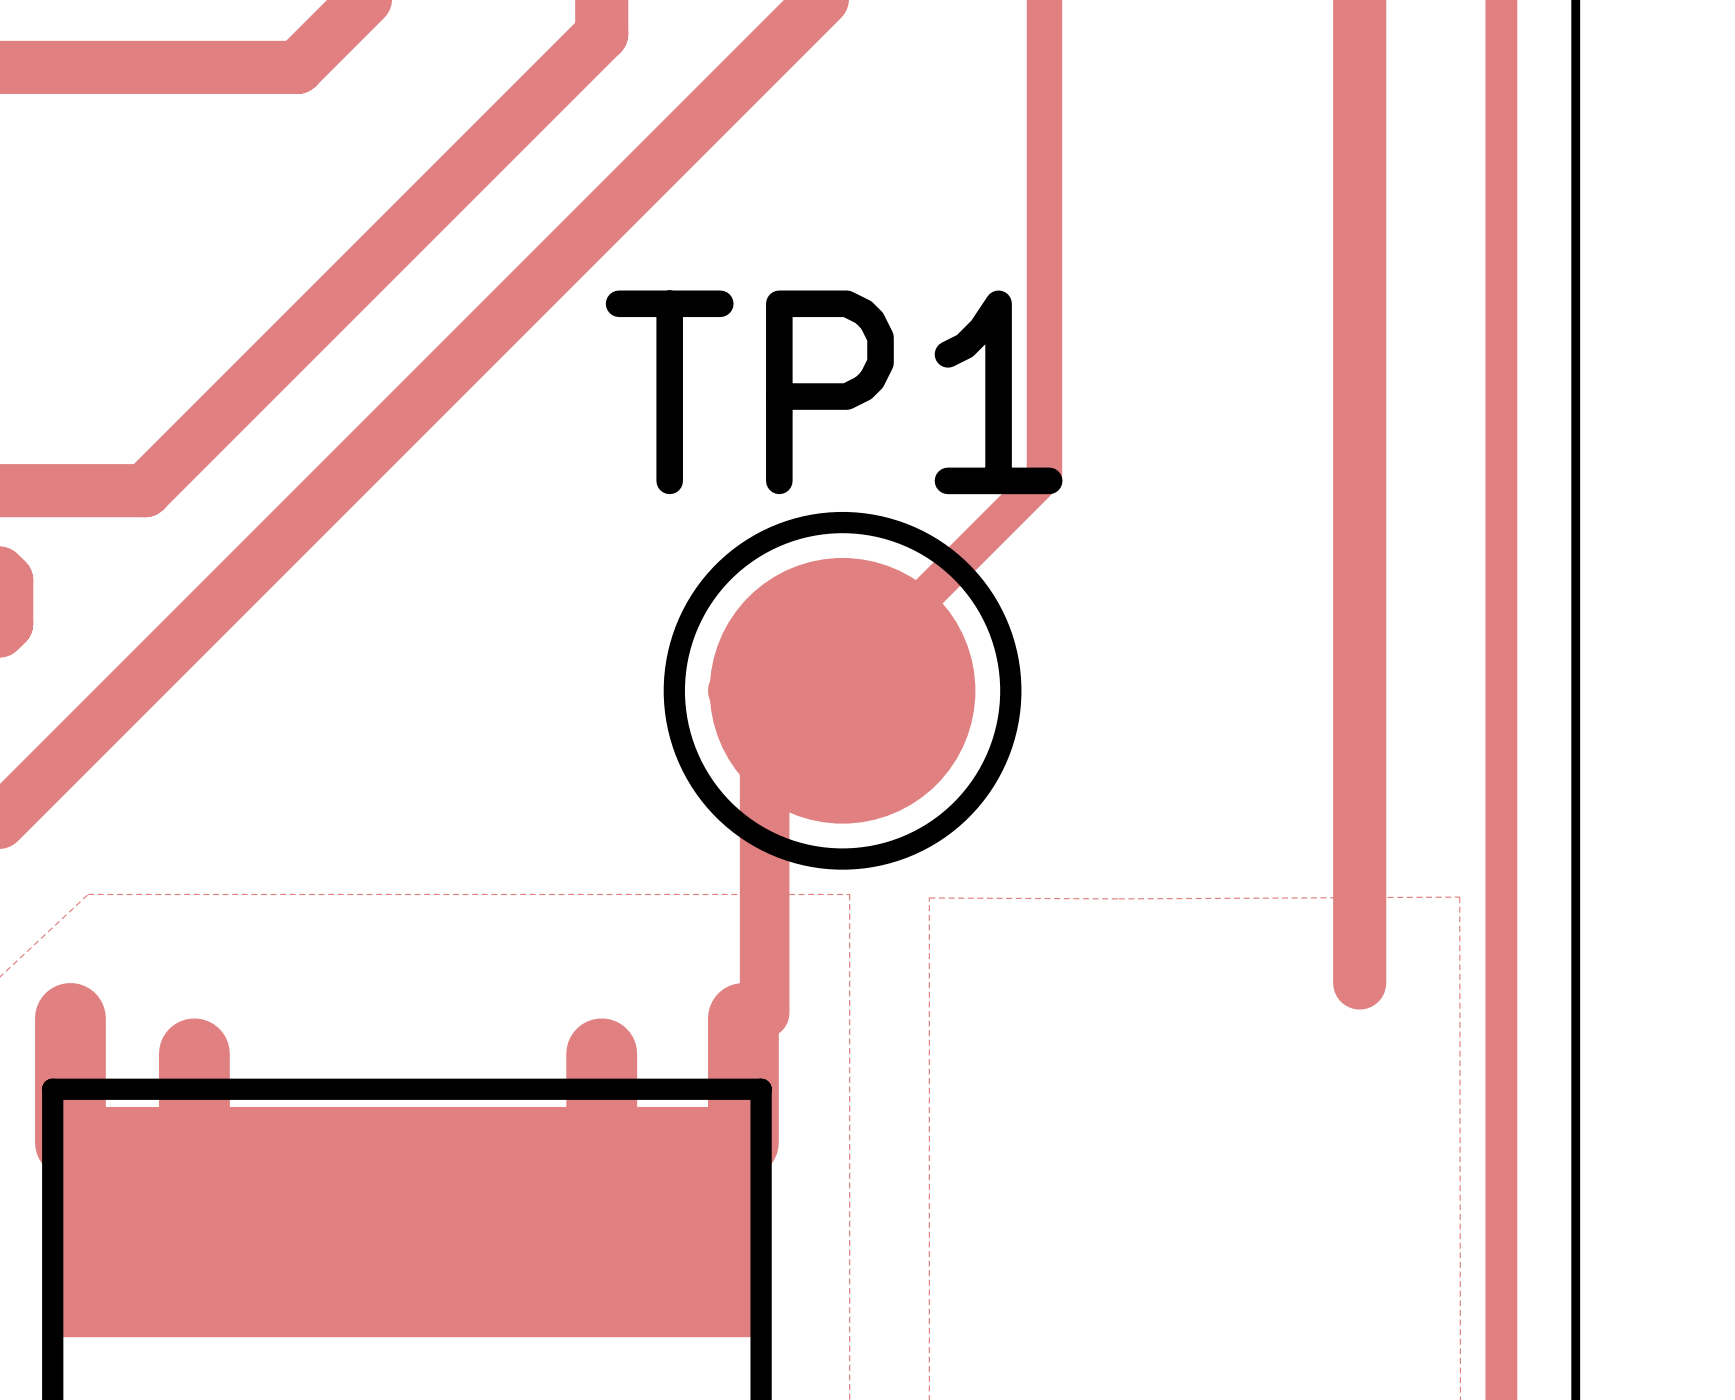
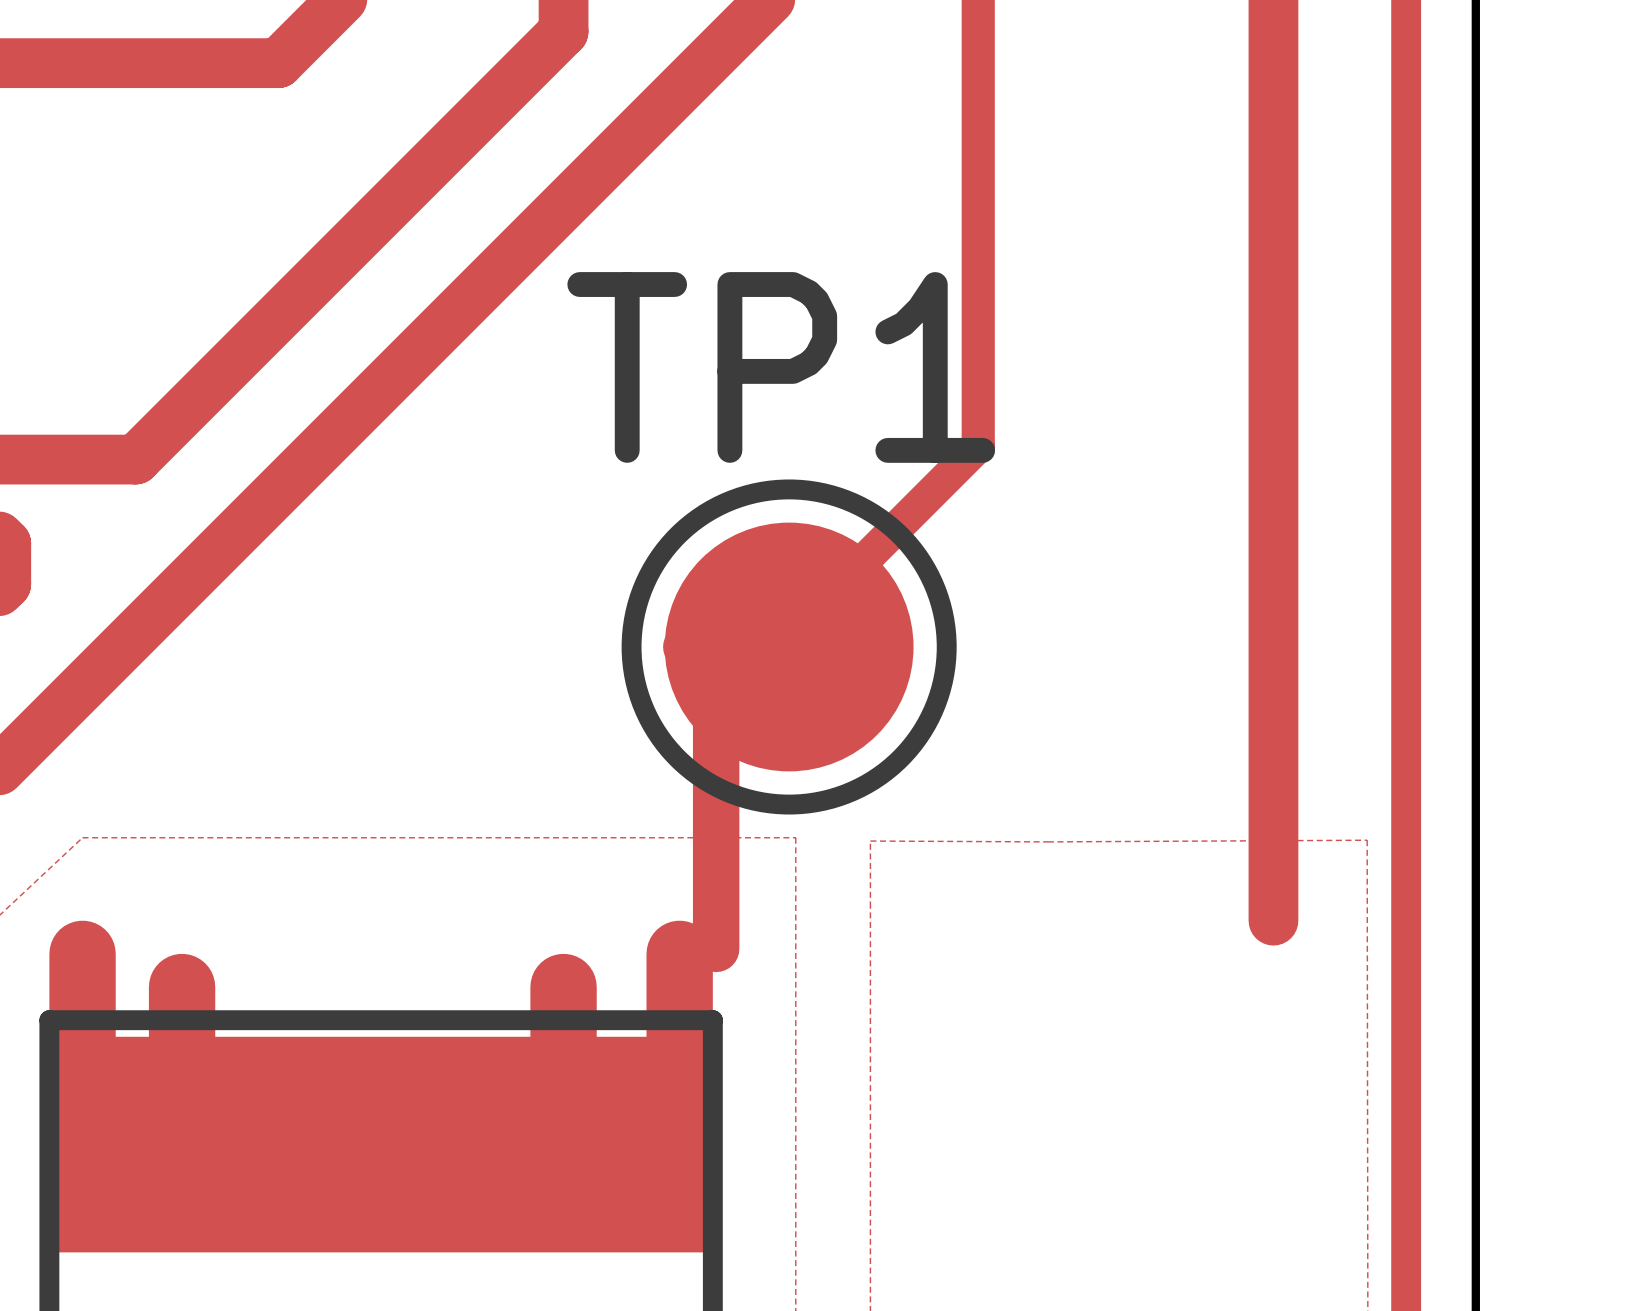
top track: (70, 1018) (70, 1142) -> (82, 953) (82, 1069)
top track: (743, 1018) (743, 1142) -> (679, 953) (679, 1069)

